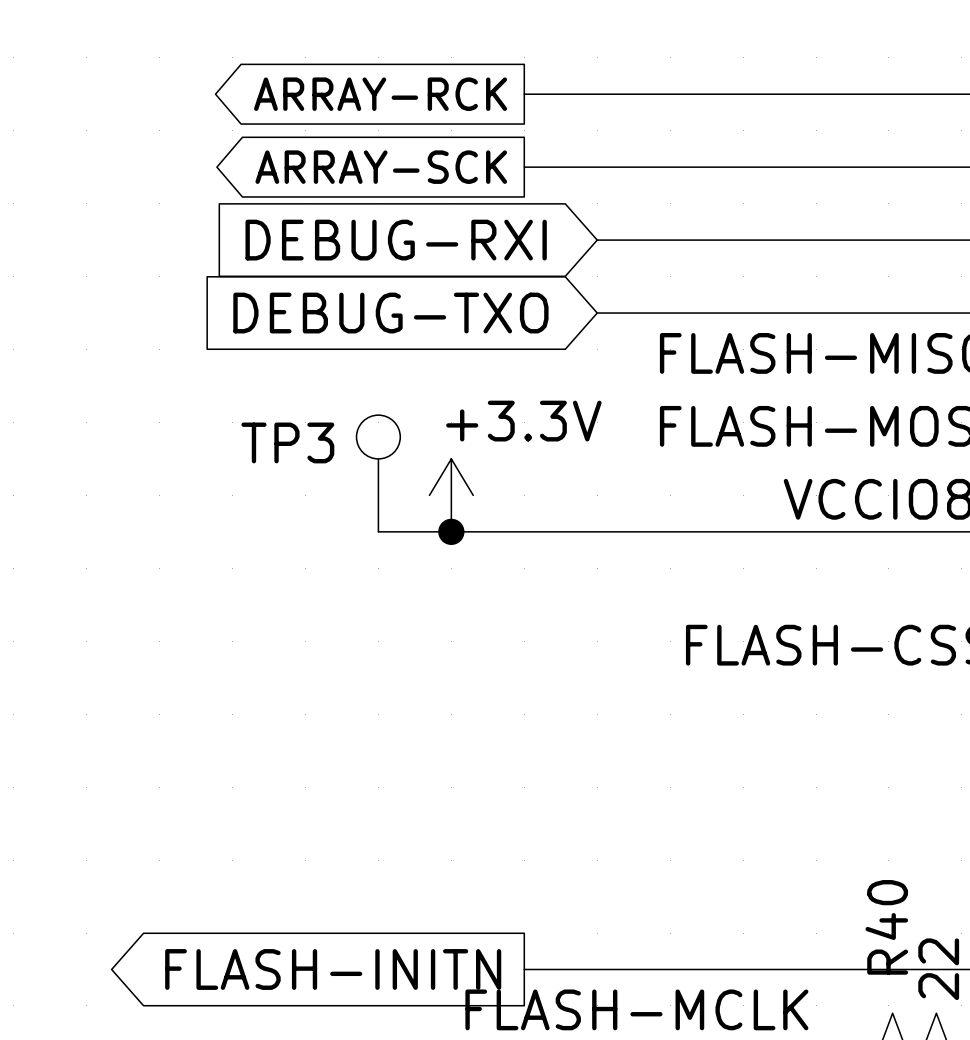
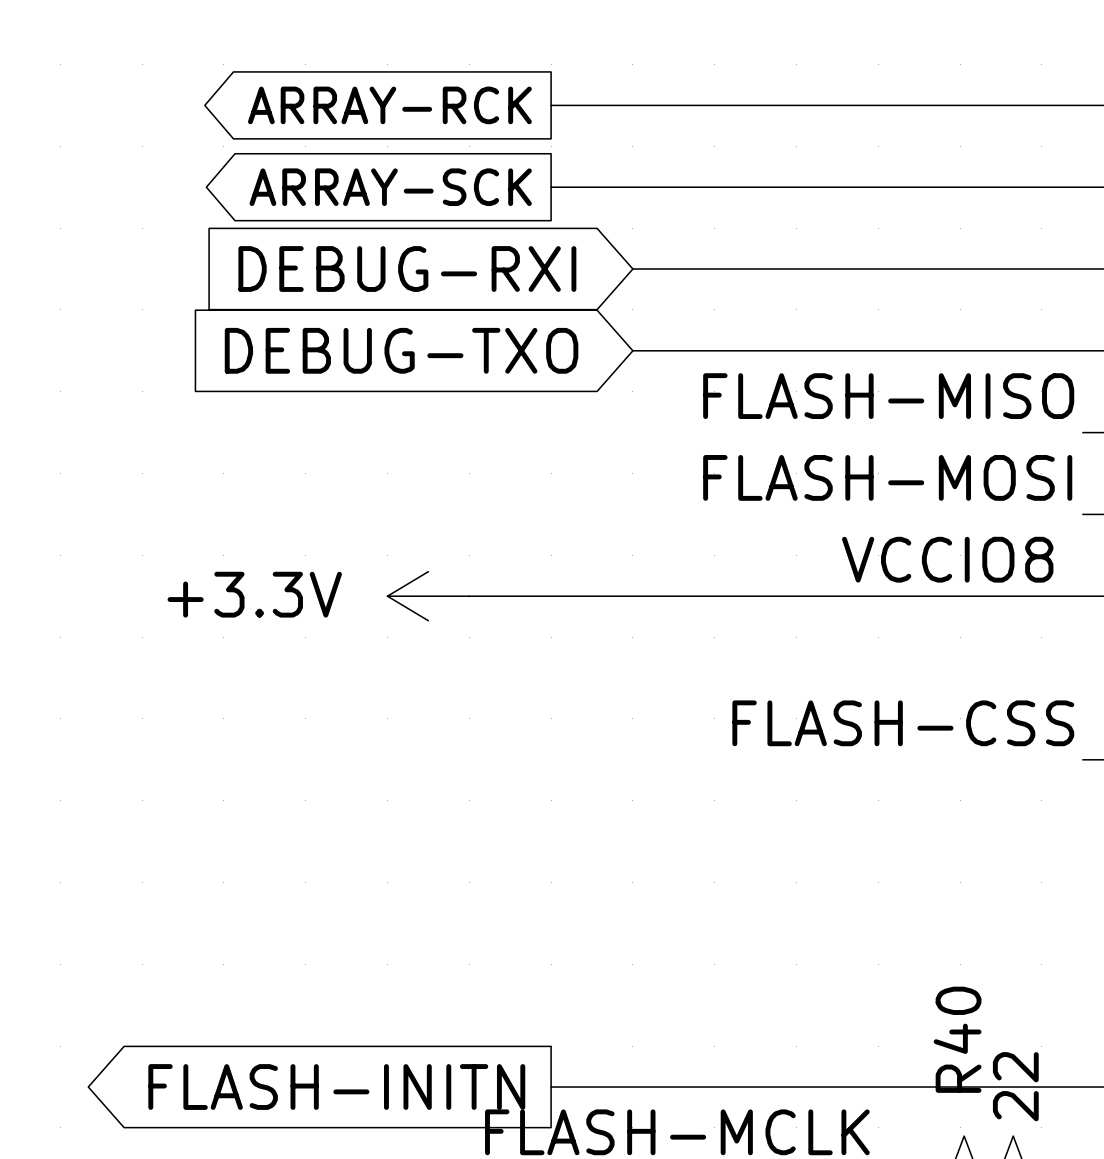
power symbol text position: +3.3V (523, 421) -> +3.3V (254, 594)
TP3: (378, 473) -> none
power symbol rotation: 0° (451, 495) -> 90° counterclockwise (428, 596)
power symbol position: +3.3V (451, 495) -> +3.3V (428, 596)
junction: (451, 531) -> none

